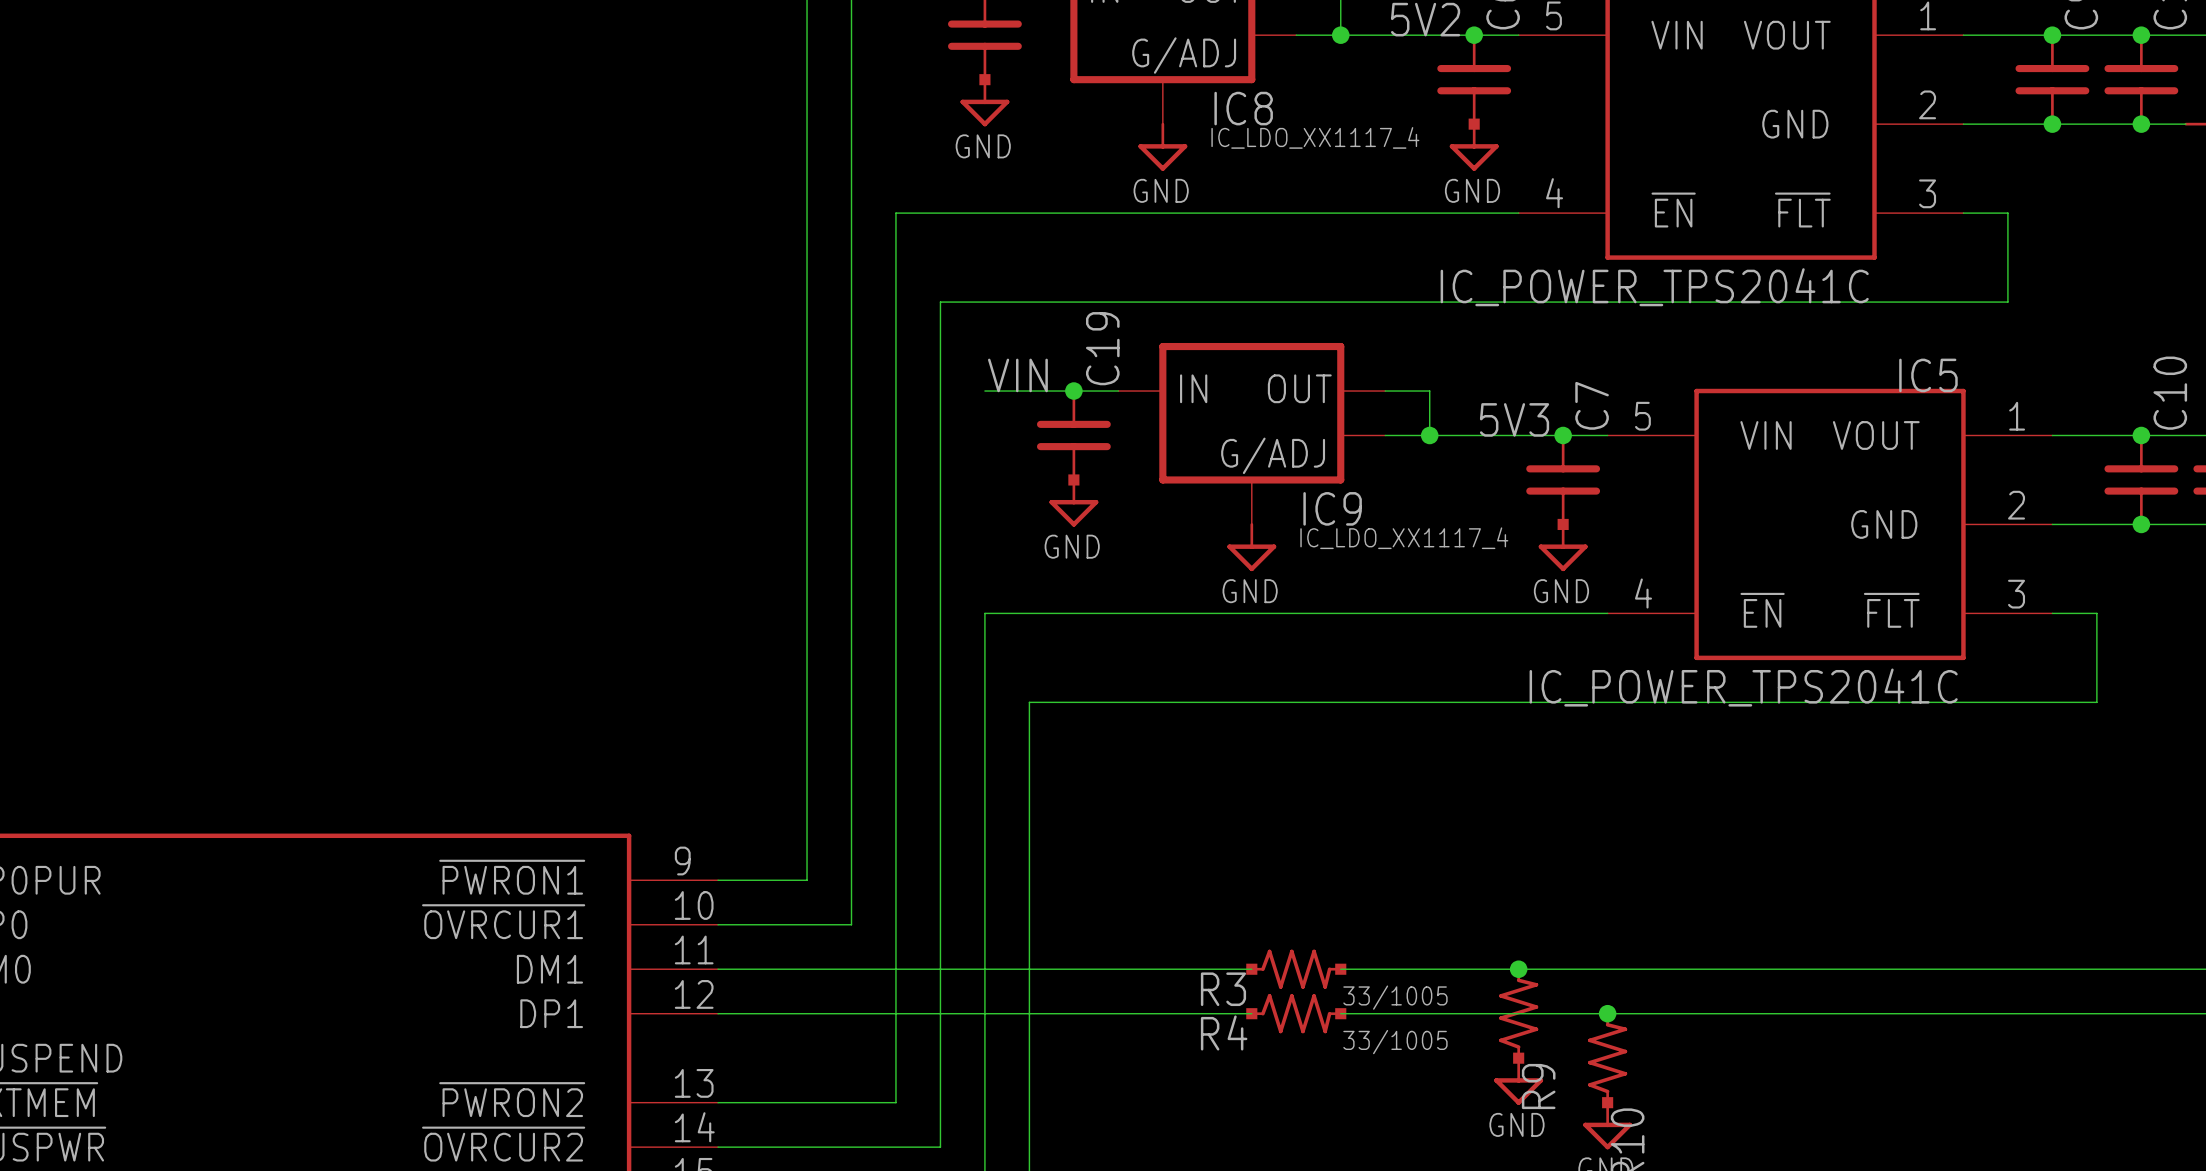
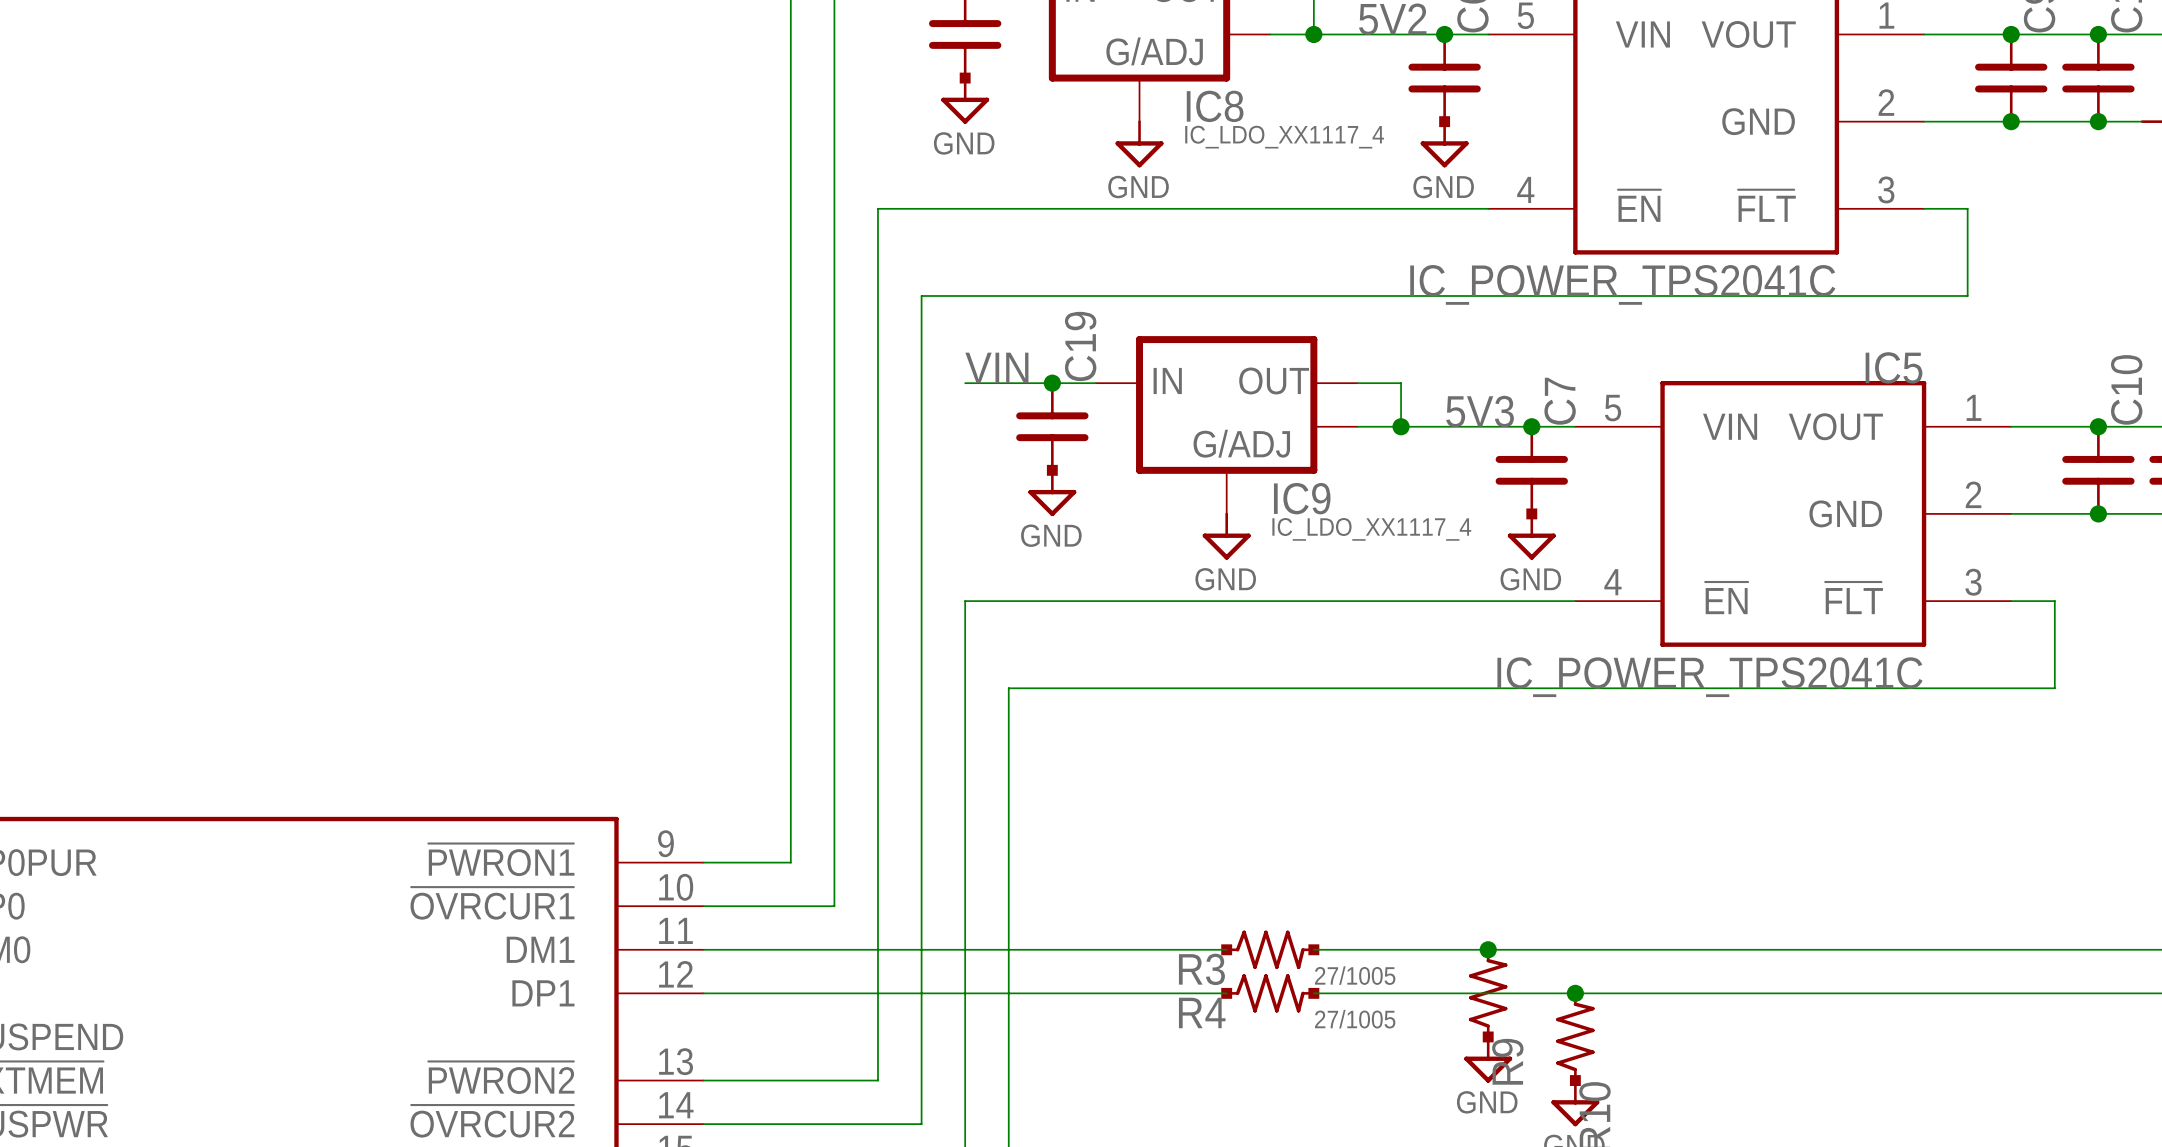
R3 value: 33/1005 (1395, 997) -> 27/1005 (1355, 975)
R4 value: 33/1005 (1395, 1042) -> 27/1005 (1355, 1019)

